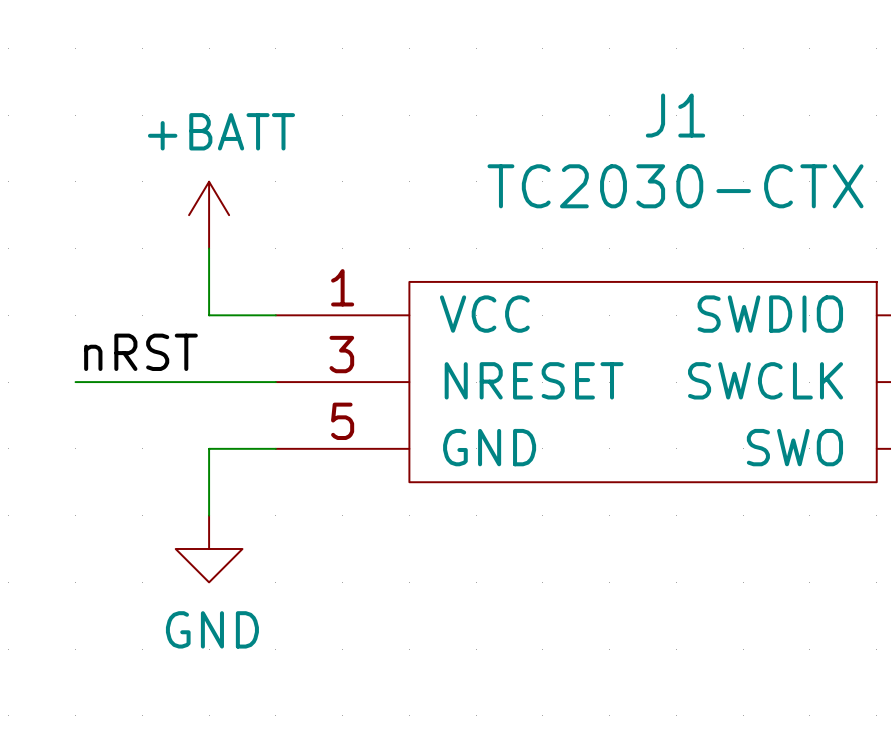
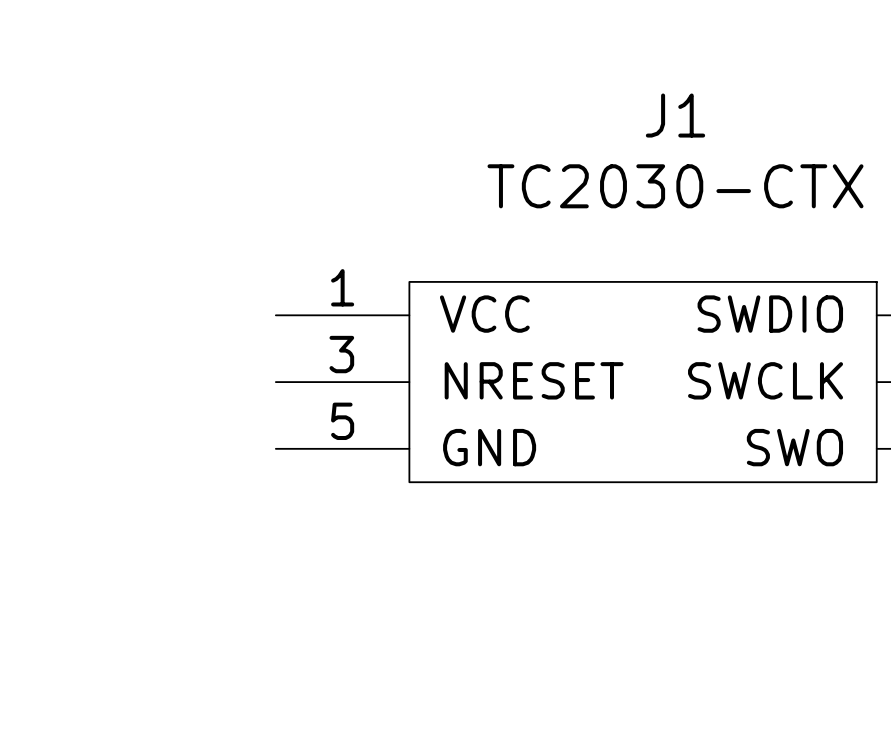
power symbol: +BATT (209, 215) -> none
wire: (209, 248) (209, 315) (275, 315) -> none
label: nRST (140, 352) -> none
wire: (75, 382) (275, 382) -> none
wire: (275, 448) (209, 448) (209, 515) -> none
power symbol: GND (209, 548) -> none

